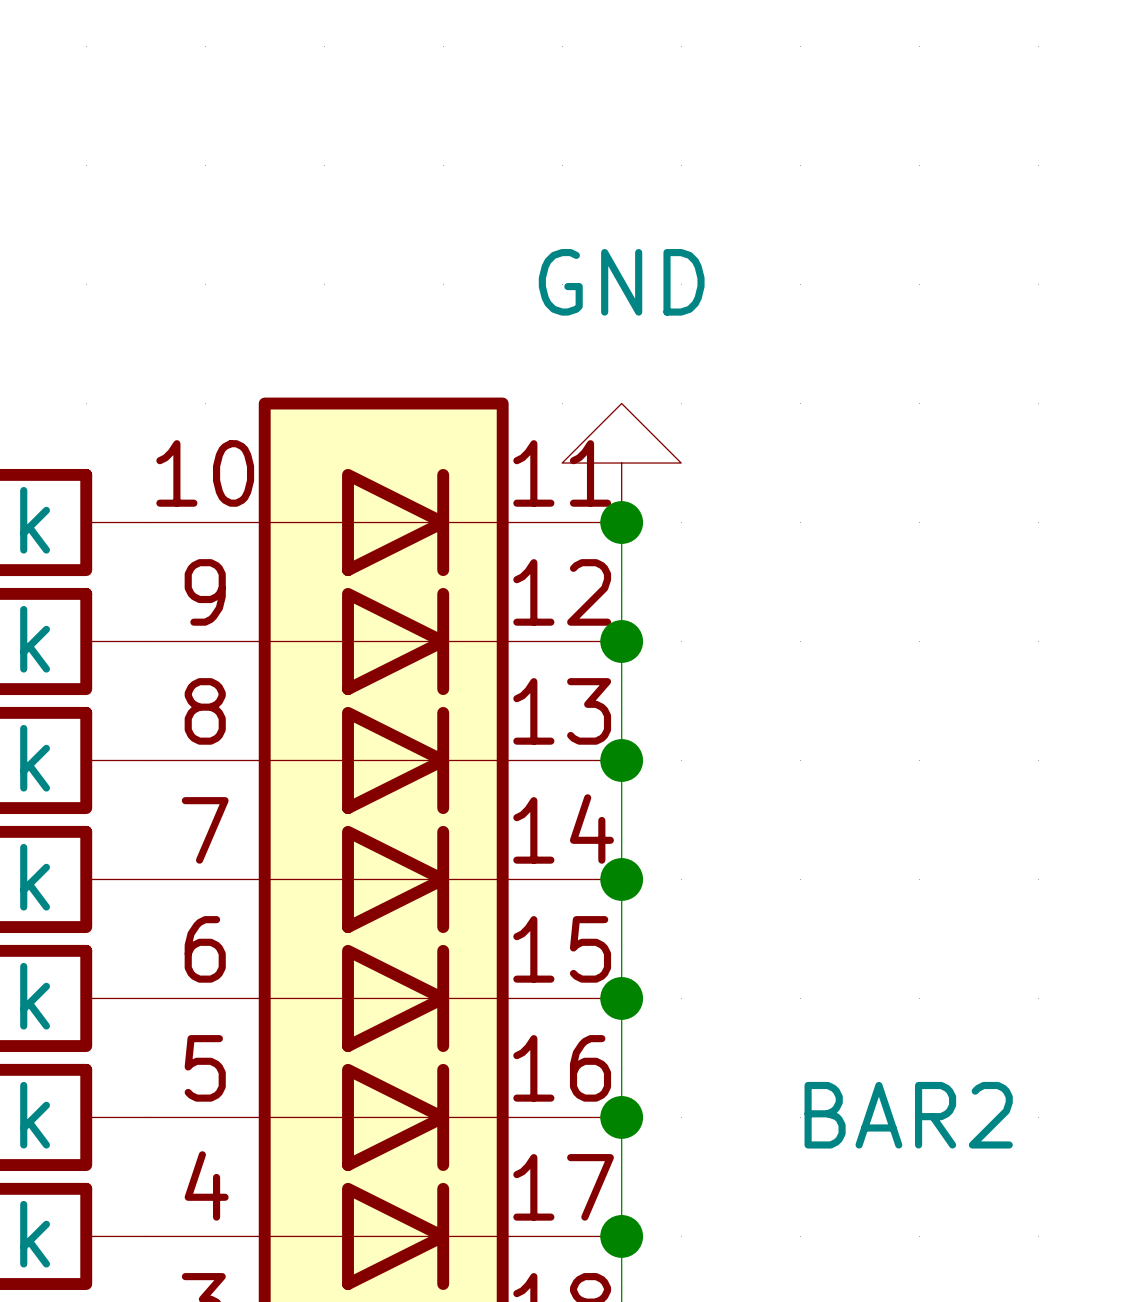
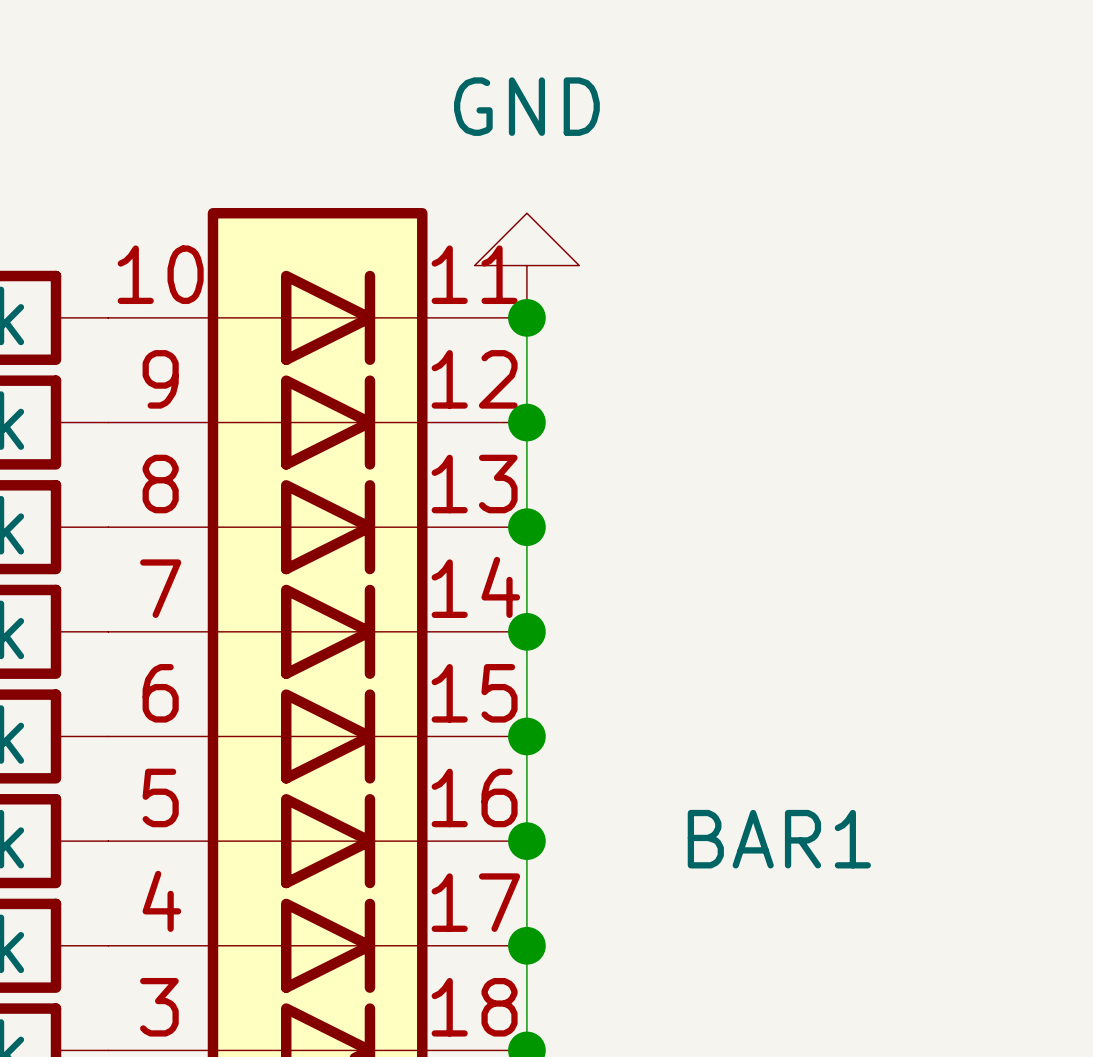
BAR2 name: BAR2 (908, 1115) -> BAR1 (779, 839)

